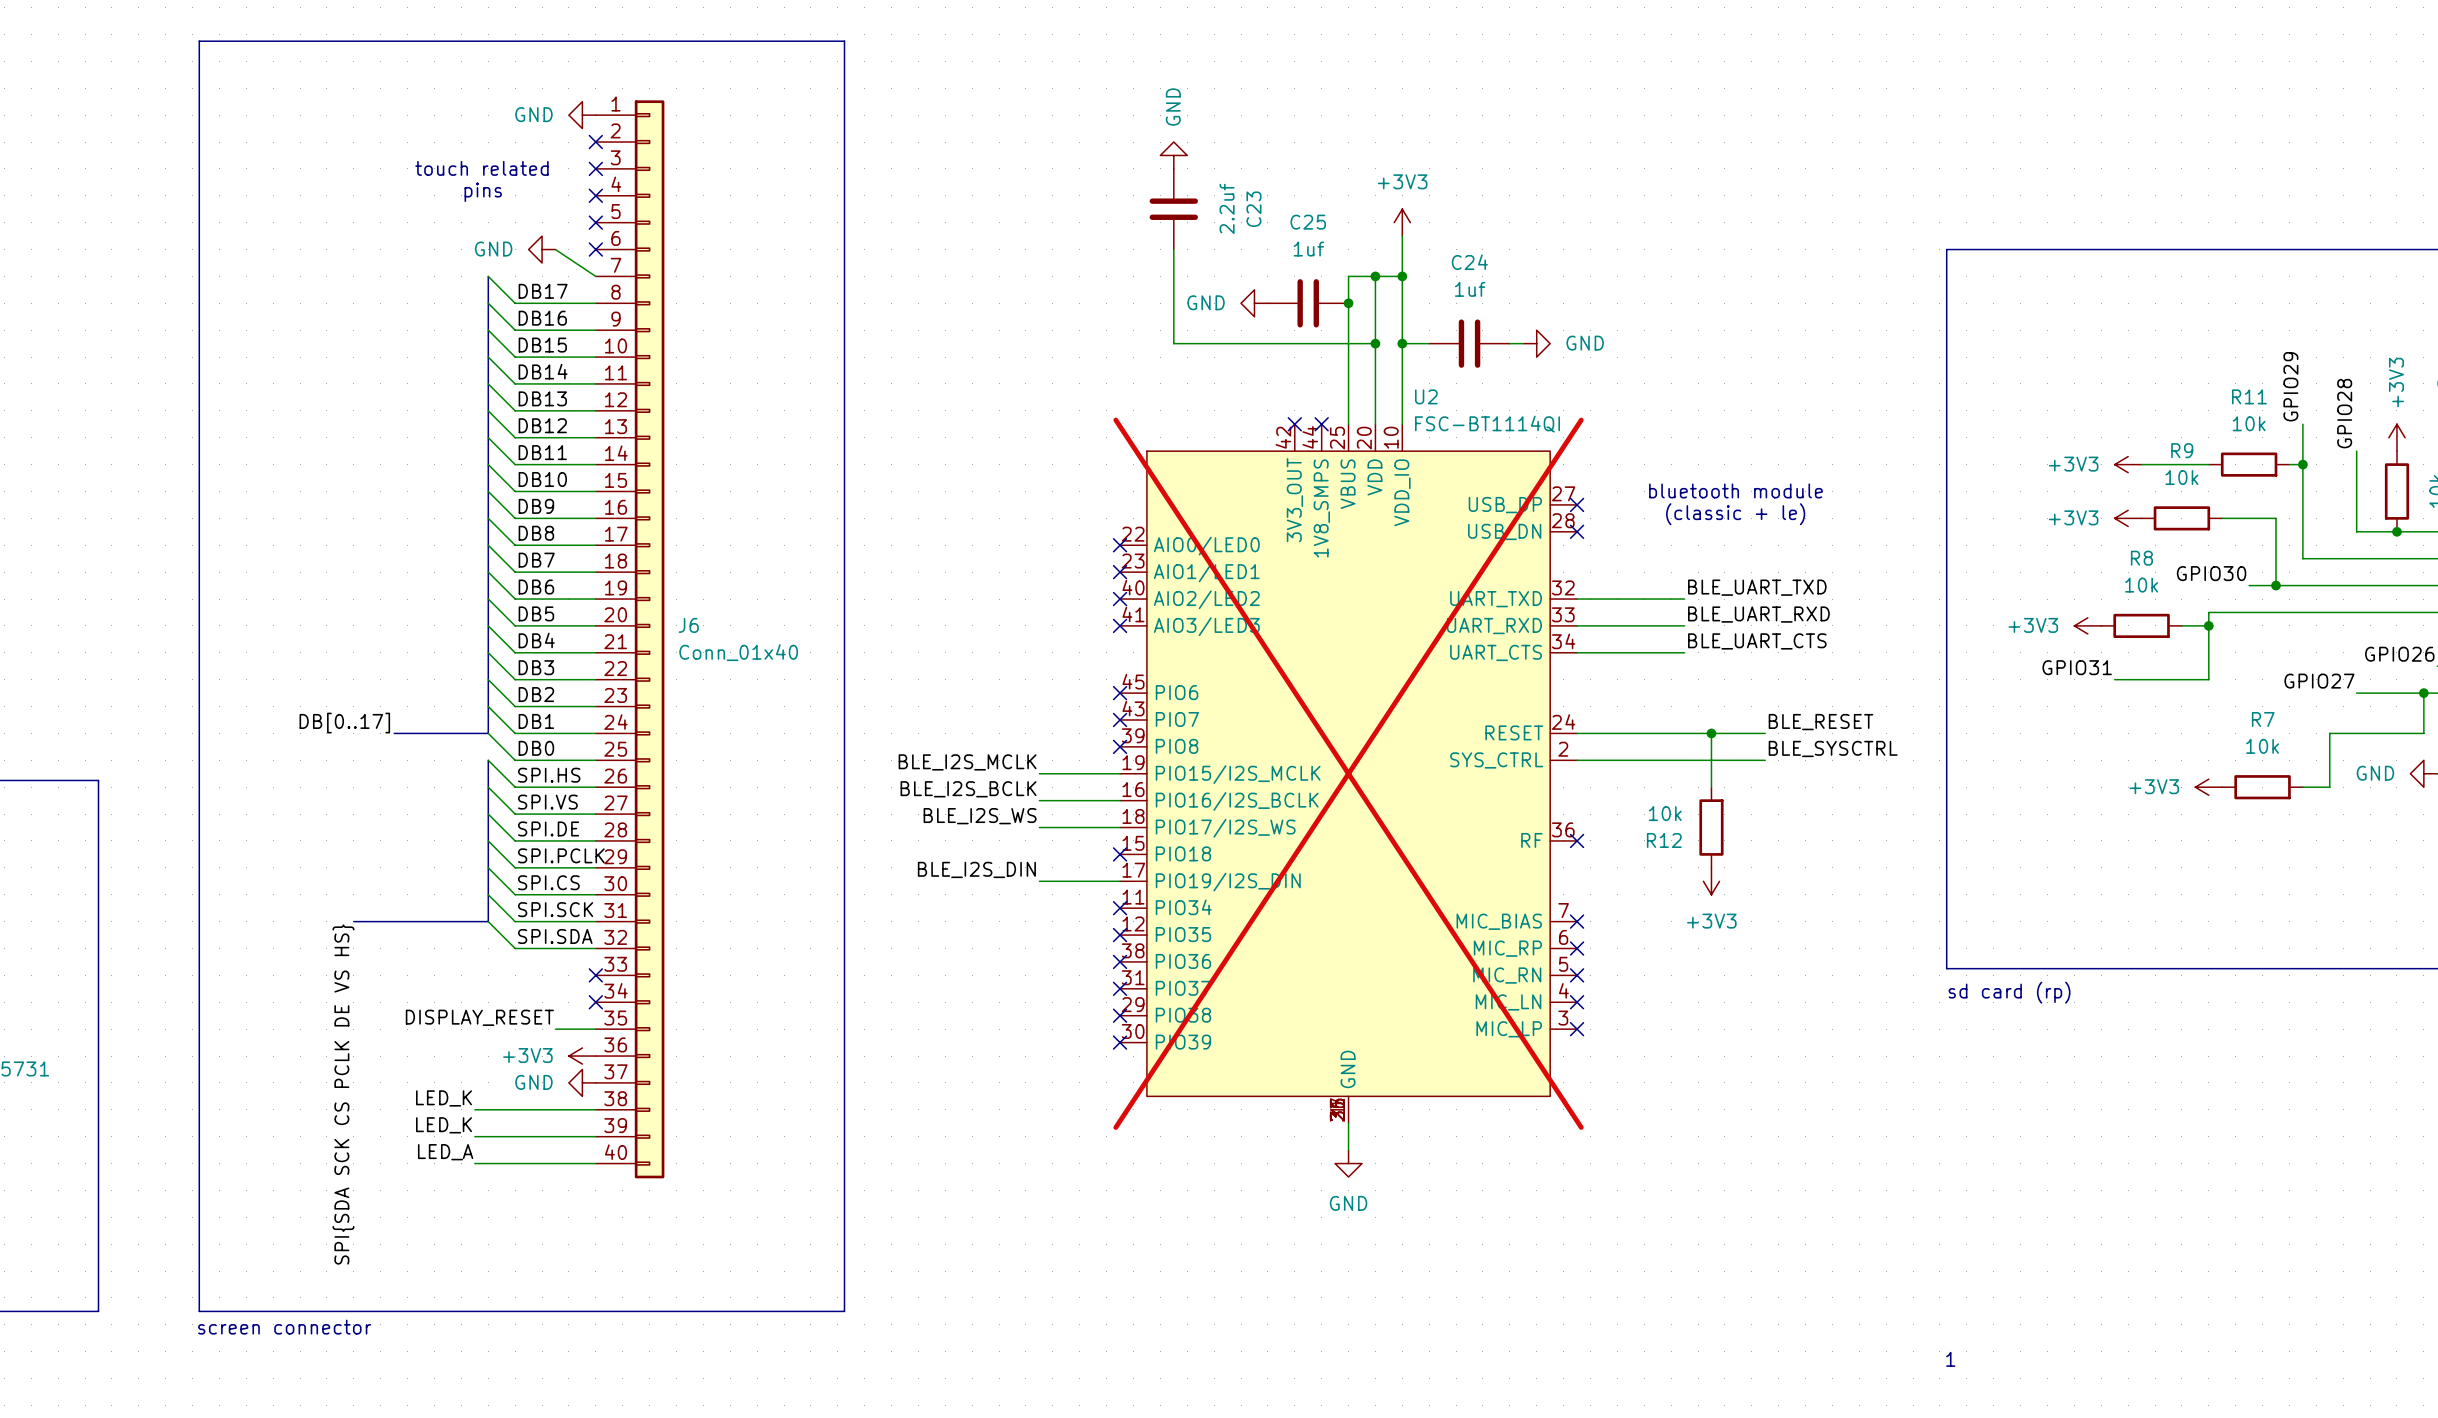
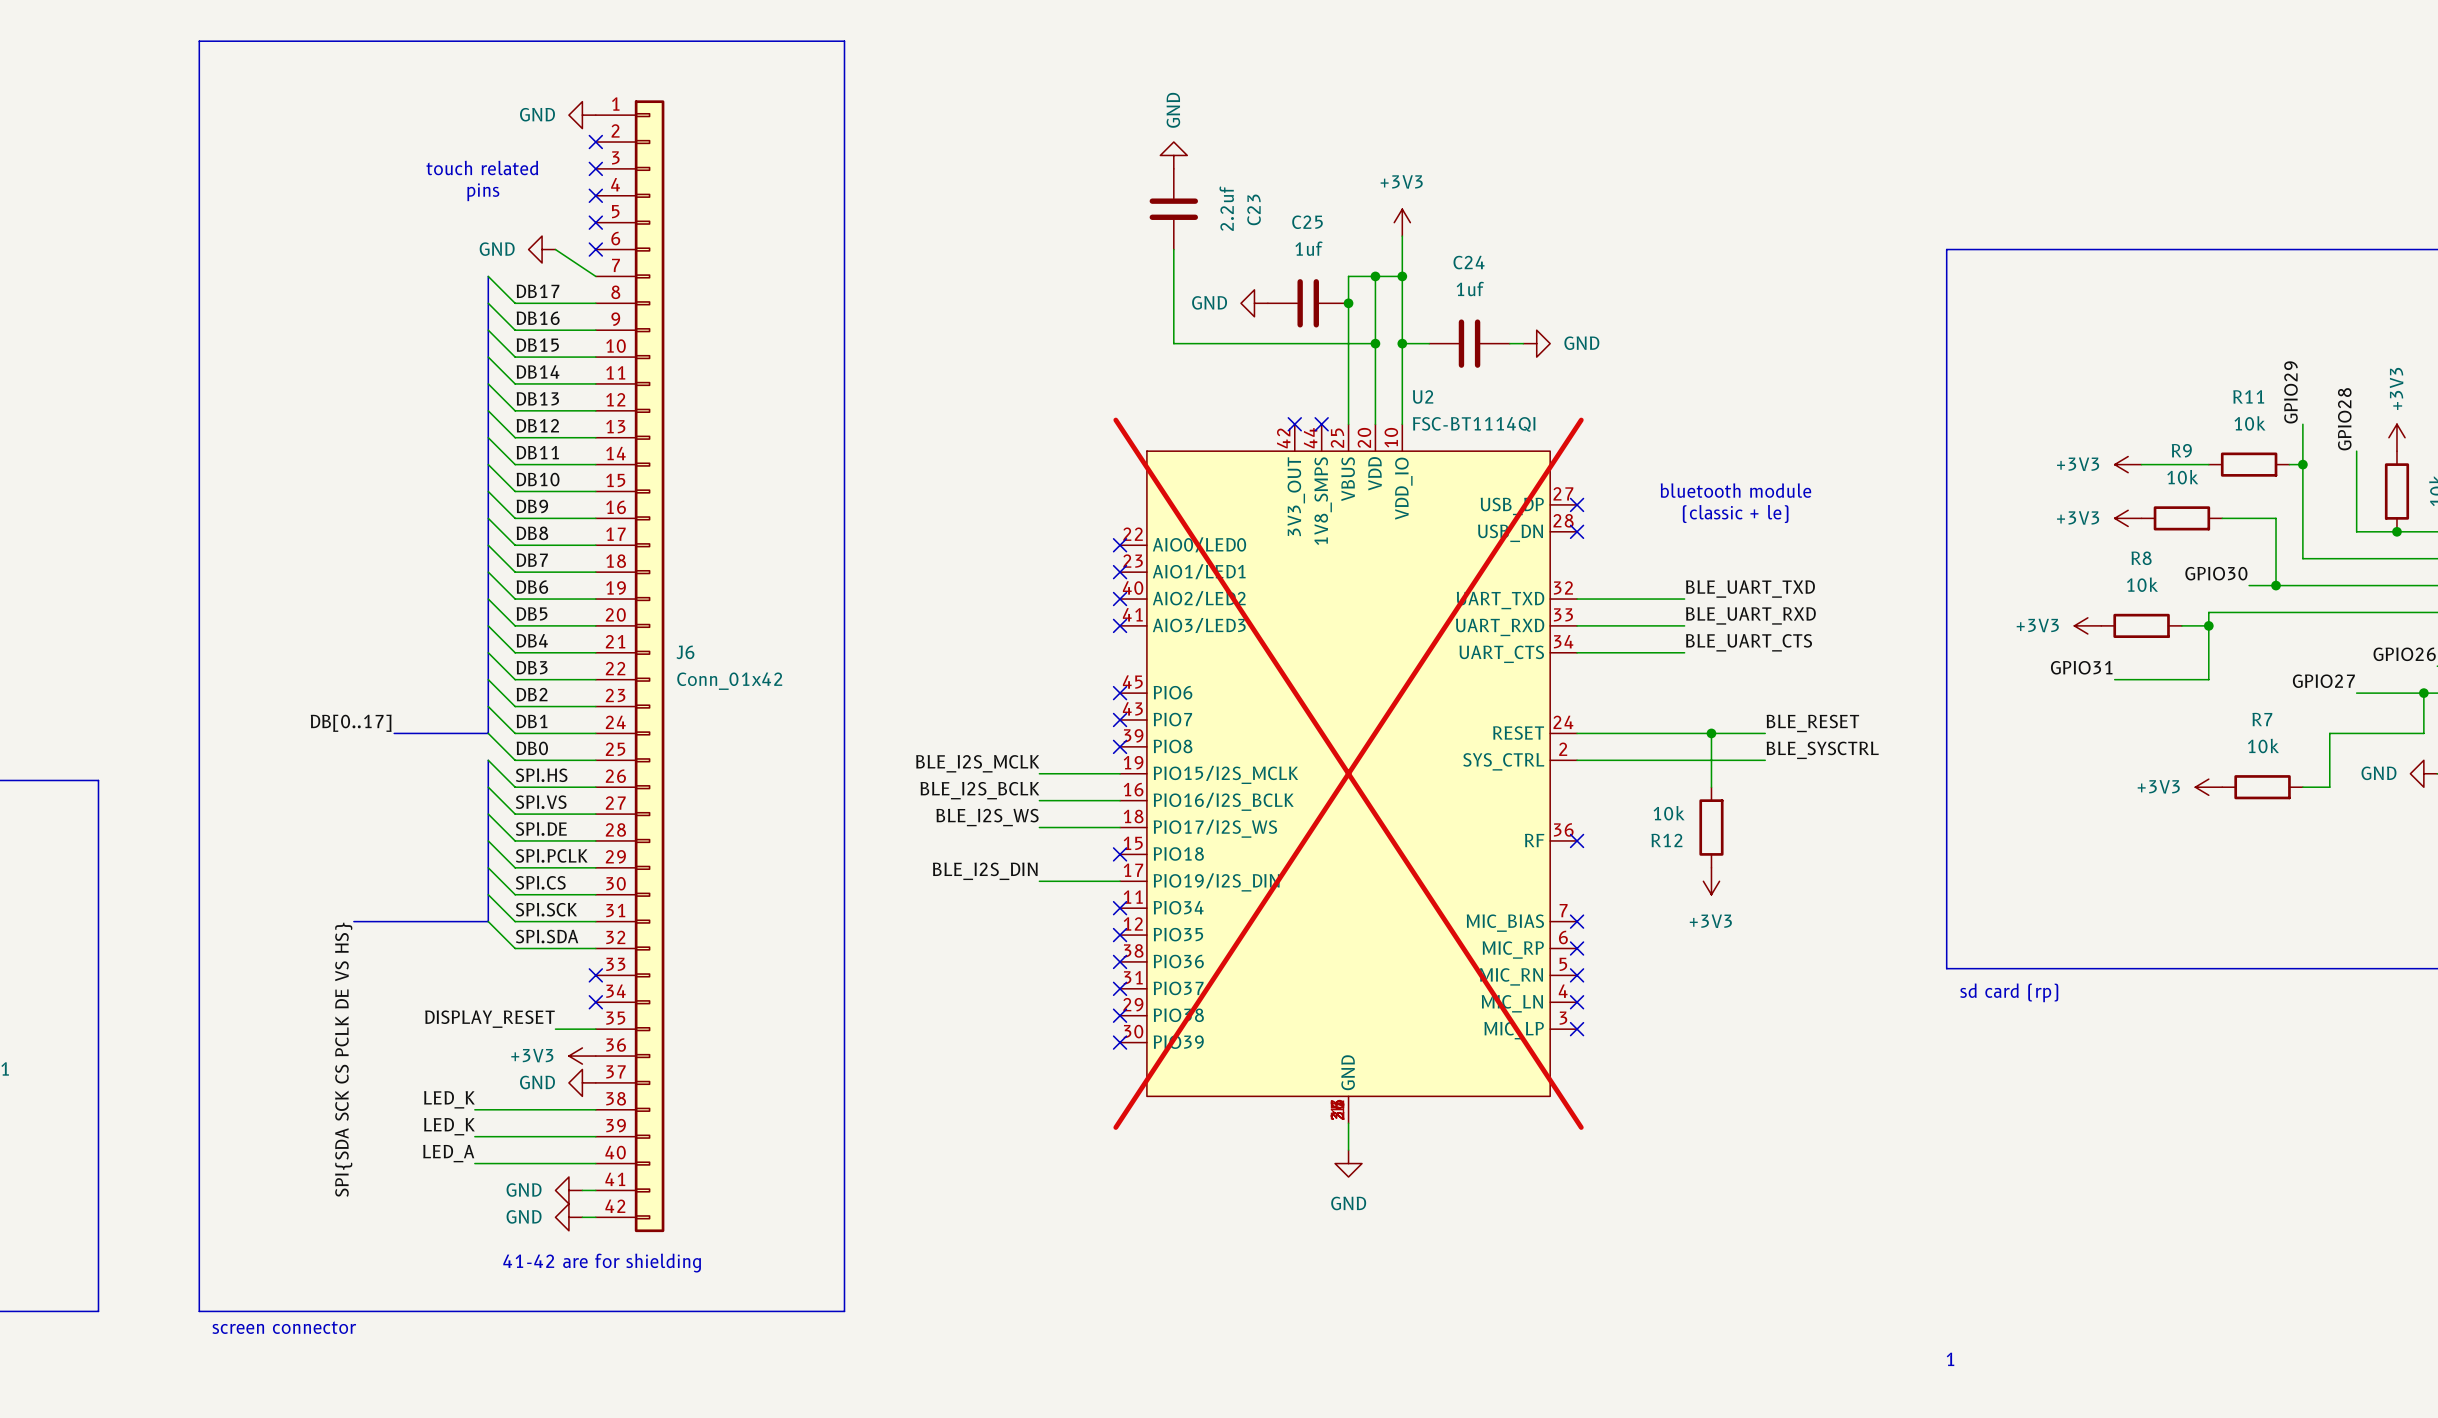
J6 symbol: [595, 100, 665, 1179] -> [595, 100, 665, 1233]
J6 value: Conn_01x40 (738, 652) -> Conn_01x42 (729, 681)
power symbol: none -> GND (568, 1190)
wire: none -> (582, 1190) (595, 1190)
power symbol: none -> GND (568, 1217)
wire: none -> (582, 1217) (595, 1217)
text: none -> 41-42 are for shielding (602, 1263)

